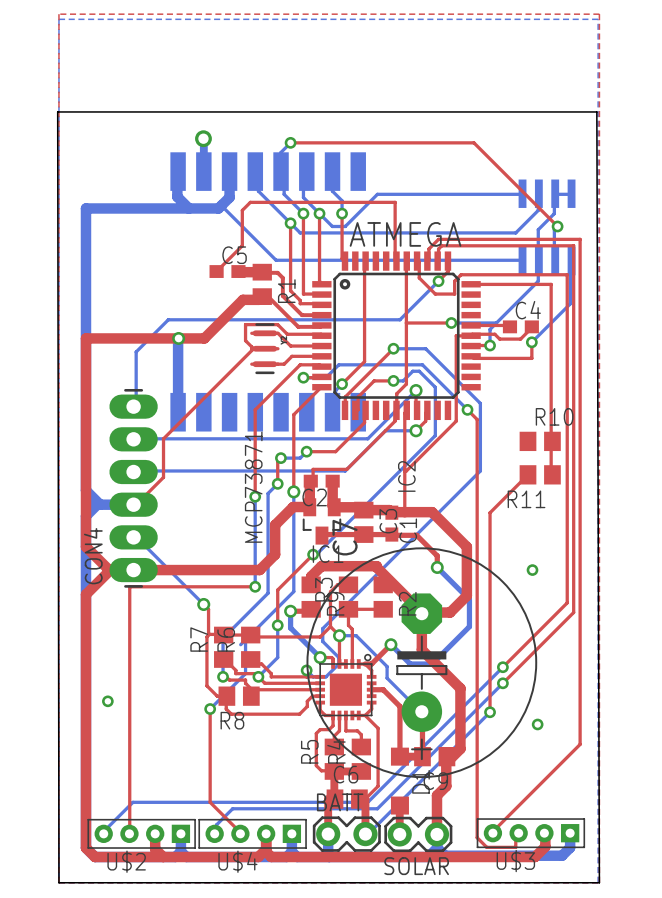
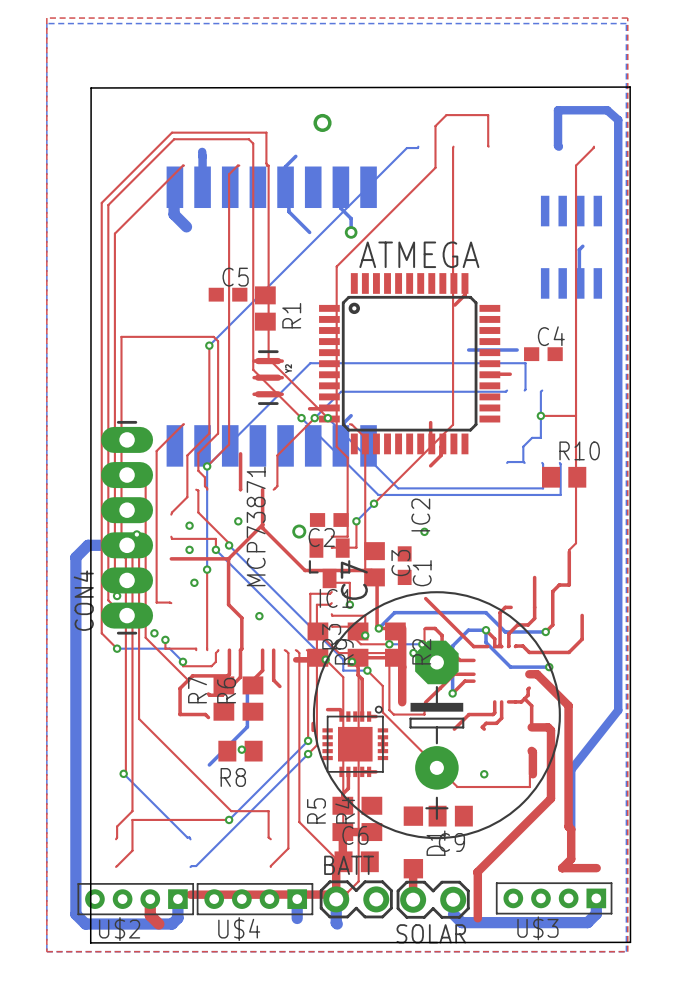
board edge: (57, 111) (596, 111) (599, 882) (58, 882) (57, 111) -> (630, 87) (91, 87) (90, 942) (630, 942) (630, 87)
bottom track: none -> (418, 146) (406, 148) (209, 345)
top track: none -> (453, 146) (453, 424) (374, 503)
top track: none -> (488, 146) (488, 115) (446, 115) (435, 126) (435, 167) (336, 266) (336, 446) (347, 457) (347, 536) (331, 536)
bottom track: none -> (558, 146) (558, 110) (607, 110) (618, 120) (618, 710) (571, 769) (571, 829)
top track: none -> (594, 146) (576, 165) (576, 543) (569, 549) (569, 584) (559, 585) (552, 591) (552, 624) (545, 631)
part position: (203, 138) -> (322, 122)
top track: (290, 142) (473, 142) (557, 226) -> none
via: (290, 142) -> none
top track: none -> (183, 165) (114, 233) (114, 593) (117, 595)
top track: none -> (239, 165) (229, 174) (229, 444) (207, 466)
bottom track: (229, 171) (229, 197) (218, 208) (85, 208) (85, 490) (100, 504) -> none
bottom track: (255, 171) (258, 171) (258, 191) (300, 232) (515, 232) (538, 210) (538, 193) -> none
bottom track: (306, 171) (303, 175) (303, 197) (332, 226) (345, 226) (377, 194) (522, 193) -> none
bottom track: (571, 193) (554, 194) (554, 213) (538, 229) (538, 281) (490, 329) (490, 345) -> none
bottom track: (221, 205) (276, 260) (522, 261) -> none
top track: (303, 213) (303, 294) (321, 294) -> none
via: (303, 213) -> none
top track: (319, 213) (319, 281) (321, 284) -> none
via: (319, 213) -> none
top track: (342, 213) (342, 258) (345, 261) -> none
top track: (290, 223) (290, 290) (300, 300) (300, 303) (321, 304) -> none
via: (290, 223) -> none
via: (557, 226) -> none
top track: (365, 261) (364, 361) (342, 384) -> none
top track: (396, 261) (395, 202) (250, 202) (242, 210) (242, 245) (216, 271) -> none
top track: (406, 261) (406, 384) (396, 393) (395, 421) (346, 469) (313, 469) (313, 477) (309, 482) (309, 507) (293, 507) (275, 525) (275, 554) (259, 570) (110, 570) (85, 594) (85, 848) (94, 857) (258, 857) (266, 849) -> none
top track: (417, 261) (419, 261) (419, 277) (435, 294) (454, 294) (454, 281) (461, 274) (567, 274) (567, 602) (502, 667) -> none
top track: (427, 261) (428, 249) (438, 239) (580, 239) (580, 744) (492, 833) -> none
top track: (437, 261) (438, 249) (441, 245) (573, 245) (573, 612) (502, 683) -> none
bottom track: (571, 261) (570, 303) (531, 342) -> none
top track: (238, 271) (277, 272) (282, 277) (282, 295) (302, 315) (321, 315) -> none
bottom track: (438, 281) (399, 319) (168, 319) (136, 351) (136, 406) (133, 406) -> none
via: (438, 281) -> none
top track: (471, 284) (551, 284) (552, 474) -> none
top track: none -> (209, 345) (209, 433) (187, 455) (187, 497) (171, 514)
via: none -> (209, 345)
top track: (406, 323) (451, 323) -> none
via: (451, 323) -> none
top track: (321, 325) (298, 326) (268, 296) (262, 296) (259, 299) (242, 299) (204, 338) (85, 338) (85, 546) (109, 570) -> none
top track: (471, 325) (509, 326) -> none
top track: (531, 326) (520, 339) (499, 339) (494, 334) (456, 335) (456, 421) (404, 470) -> none
top track: (277, 333) (290, 346) (321, 346) -> none
bottom track: (182, 335) (178, 338) (178, 412) -> none
top track: (321, 335) (287, 334) (277, 324) (245, 324) (245, 340) (251, 347) (251, 350) (163, 438) (163, 477) (137, 503) (133, 504) -> none
via: (178, 338) -> none
top track: (531, 342) (531, 358) (473, 358) (471, 356) -> none
via: (531, 342) -> none
via: (490, 345) -> none
top track: (393, 348) (345, 396) (345, 410) -> none
bottom track: (393, 348) (425, 348) (480, 403) (480, 470) (322, 628) (322, 641) (338, 657) (338, 664) (325, 676) (313, 676) (306, 670) -> none
via: (393, 348) -> none
top track: (321, 356) (292, 356) (284, 364) (277, 364) -> none
bottom track: none -> (507, 390) (341, 391) (314, 418)
bottom track: none -> (524, 390) (525, 363) (310, 363) (207, 466) (207, 569)
bottom track: none -> (542, 390) (540, 437) (532, 437) (523, 446) (523, 462)
top track: (321, 366) (319, 364) (300, 364) (255, 409) (255, 496) -> none
bottom track: (303, 377) (325, 377) (338, 364) (422, 364) (467, 409) -> none
via: (303, 377) -> none
top track: (393, 380) (374, 380) (358, 396) (358, 409) (355, 410) -> none
bottom track: (393, 380) (403, 380) (412, 371) (419, 371) (435, 387) (435, 435) (316, 554) (313, 554) -> none
via: (393, 380) -> none
via: (342, 384) -> none
top track: none -> (540, 415) (576, 415)
via: none -> (540, 415)
top track: none -> (301, 418) (253, 369) (253, 143) (248, 139) (174, 139) (108, 205) (108, 600) (117, 609)
bottom track: none -> (301, 418) (378, 494) (560, 494) (559, 462)
via: none -> (301, 418)
top track: none -> (314, 418) (277, 455) (277, 486) (273, 489)
via: none -> (314, 418)
top track: none -> (327, 418) (268, 358) (268, 165) (266, 163) (266, 132) (172, 132) (101, 202) (101, 633) (117, 648)
bottom track: none -> (327, 418) (398, 488) (543, 488) (542, 462)
via: none -> (327, 418)
top track: (321, 387) (293, 414) (293, 491) -> none
bottom track: (416, 390) (367, 438) (133, 439) -> none
via: (416, 390) -> none
top track: none -> (183, 424) (156, 451) (156, 602) (171, 603)
top track: none -> (349, 424) (365, 437) (365, 570)
top track: (467, 409) (477, 419) (477, 837) (486, 847) (515, 847) (515, 834) (518, 833) -> none
via: (467, 409) -> none
top track: (365, 410) (364, 422) (335, 451) (306, 451) -> none
top track: (406, 410) (404, 413) (404, 512) -> none
top track: none -> (240, 453) (240, 489)
bottom track: none -> (523, 462) (507, 462)
bottom track: none -> (523, 462) (524, 462)
bottom track: (416, 430) (385, 430) (345, 470) (133, 472) -> none
via: (416, 430) -> none
via: none -> (207, 466)
top track: none -> (134, 468) (145, 479) (145, 637) (188, 680)
bottom track: (306, 451) (300, 458) (280, 458) -> none
via: (306, 451) -> none
top track: none -> (196, 489) (198, 490) (198, 512) (229, 545)
top track: none -> (207, 489) (204, 486) (204, 477) (198, 470) (198, 453) (218, 433) (218, 341) (213, 336) (121, 336) (121, 554) (125, 558) (125, 771) (123, 773)
top track: none -> (262, 489) (262, 528) (305, 570) (371, 570) (377, 575) (377, 626) (378, 628) (402, 628) (402, 702)
top track: (280, 458) (277, 461) (277, 483) -> none
via: (280, 458) -> none
bottom track: none -> (374, 503) (356, 521)
via: none -> (374, 503)
top track: (527, 474) (490, 512) (490, 712) -> none
R11: (540, 474) -> none
top track: (332, 481) (334, 507) (360, 507) (363, 510) (389, 510) (391, 512) (432, 512) (466, 546) (466, 595) (450, 612) (421, 612) -> none
via: none -> (238, 521)
top track: none -> (356, 521) (356, 547) (331, 547)
via: none -> (356, 521)
bottom track: (277, 483) (268, 493) (268, 593) (223, 638) (223, 676) -> none
via: (277, 483) -> none
top track: none -> (262, 524) (228, 558)
via: none -> (189, 525)
bottom track: (293, 491) (293, 591) (240, 644) -> none
via: none -> (424, 531)
top track: none -> (136, 534) (128, 543) (128, 552) (132, 556) (132, 811) (117, 826) (116, 839)
via: none -> (136, 534)
top track: none -> (171, 536) (172, 538) (215, 538) (215, 549)
bottom track: (255, 496) (255, 586) -> none
via: (255, 496) -> none
bottom track: none -> (229, 545) (343, 659) (343, 670) (367, 670)
via: none -> (229, 545)
top track: none -> (136, 547) (139, 549) (139, 718) (231, 811) (268, 811) (268, 837) (270, 839)
via: none -> (189, 549)
bottom track: none -> (215, 549) (325, 659)
via: none -> (215, 549)
top track: none -> (171, 558) (228, 558)
top track: none -> (228, 558) (228, 604) (241, 617) (240, 677) (222, 695) (208, 694)
top track: none -> (207, 569) (207, 650)
via: none -> (207, 569)
top track: none -> (534, 577) (534, 618) (528, 624) (517, 624) (508, 633) (508, 646)
top track: (321, 535) (416, 535) (437, 555) (437, 567) -> none
bottom track: (133, 537) (137, 538) (203, 604) -> none
top track: none -> (331, 581) (332, 582) (349, 582) (349, 604)
via: none -> (194, 582)
top track: none -> (331, 592) (330, 593) (310, 593) (310, 633) (316, 639) (316, 745) (308, 754)
via: none -> (117, 595)
top track: (313, 554) (277, 590) (277, 625) -> none
via: (313, 554) -> none
top track: none -> (425, 598) (473, 646) (487, 646)
top track: none -> (331, 603) (316, 604) (316, 631) (338, 653) (389, 653) (389, 710) (393, 714) (424, 714) (424, 703) (454, 674) (473, 674)
via: none -> (349, 604)
top track: none -> (511, 607) (505, 607) (500, 612) (500, 645) (501, 646) (494, 646) (494, 638) (486, 630)
bottom track: (437, 567) (469, 599) (469, 626) (432, 664) (410, 664) (390, 644) -> none
via: (437, 567) -> none
top track: none -> (331, 614) (332, 615) (365, 615) (365, 635)
top track: none -> (582, 615) (582, 639) (568, 652) (529, 652) (522, 646) (515, 646)
via: none -> (259, 616)
via: (532, 570) -> none
top track: none -> (331, 625) (356, 626) (356, 639) (360, 644) (389, 644)
bottom track: none -> (378, 628) (394, 612) (486, 612) (505, 631) (545, 631)
via: none -> (378, 628)
via: none -> (486, 630)
top track: (348, 584) (337, 584) (330, 591) (330, 626) -> none
via: none -> (545, 631)
via: none -> (154, 633)
top track: (255, 586) (129, 586) (129, 833) -> none
via: (255, 586) -> none
via: none -> (365, 635)
top track: none -> (165, 639) (165, 648) (196, 650)
via: none -> (165, 639)
bottom track: none -> (389, 644) (422, 644)
via: none -> (389, 644)
top track: none -> (422, 644) (424, 642) (424, 628) (435, 628) (442, 635) (442, 642) (459, 660) (473, 660)
via: none -> (422, 644)
bottom track: none -> (117, 648) (169, 648) (182, 661)
via: none -> (117, 648)
top track: none -> (218, 650) (215, 653) (215, 661) (211, 666) (182, 666) (182, 661)
top track: none -> (229, 650) (229, 674) (227, 675) (192, 675) (180, 688) (180, 714) (205, 714) (208, 717)
top track: none -> (262, 650) (262, 670) (246, 686)
top track: none -> (273, 650) (273, 680) (279, 686)
top track: none -> (284, 650) (288, 653) (288, 848) (270, 866)
top track: none -> (295, 650) (299, 653) (299, 822) (344, 866)
top track: none -> (306, 650) (308, 740)
top track: (203, 604) (208, 609) (209, 634) -> none
via: (203, 604) -> none
via: none -> (413, 653)
bottom track: (290, 611) (290, 627) (320, 657) -> none
via: (290, 611) -> none
top track: none -> (325, 659) (343, 677) (344, 839)
via: none -> (325, 659)
top track: (421, 612) (421, 649) (460, 688) (460, 748) (446, 763) -> none
top track: (421, 612) (376, 566) (321, 566) (311, 576) (311, 584) (311, 575) (320, 566) (374, 566) (383, 575) (383, 584) (393, 584) (421, 613) -> none
via: none -> (182, 661)
top track: none -> (352, 661) (358, 668) (358, 881) (344, 894) (270, 894)
via: none -> (352, 661)
bottom track: none -> (549, 667) (510, 667) (486, 642) (486, 630) (468, 630) (452, 646) (452, 693)
via: none -> (549, 667)
top track: none -> (367, 670) (382, 686) (382, 712) (457, 787) (529, 787) (529, 776) (532, 774) (531, 750)
via: none -> (367, 670)
top track: none -> (529, 674) (537, 674) (568, 705) (568, 826) (571, 829) (571, 859) (562, 868) (596, 868)
bottom track: (277, 625) (277, 657) (258, 676) -> none
via: (277, 625) -> none
top track: (330, 626) (320, 636) (252, 636) (250, 635) (209, 634) -> none
top track: (330, 626) (339, 635) (339, 664) (345, 664) -> none
top track: none -> (473, 681) (464, 681) (452, 693)
top track: (209, 634) (206, 636) (206, 685) (217, 696) (226, 696) (226, 709) (231, 714) (299, 714) (307, 706) (307, 701) (312, 696) (320, 696) -> none
bottom track: (339, 635) (356, 635) (387, 666) (387, 678) (408, 700) (416, 700) (421, 705) (421, 711) (423, 710) -> none
via: (339, 635) -> none
top track: none -> (529, 688) (528, 695) (521, 701) (508, 701)
via: none -> (452, 693)
top track: (390, 644) (371, 664) (365, 664) (371, 670) (371, 676) -> none
via: (390, 644) -> none
top track: none -> (524, 698) (531, 705) (531, 727) (548, 727) (550, 730) (550, 798) (477, 872) (477, 918)
top track: none -> (494, 701) (493, 714) (468, 714) (454, 729)
top track: none -> (501, 701) (501, 718) (496, 723) (486, 723) (482, 727) (484, 729)
via: (320, 657) -> none
top track: (223, 659) (235, 670) (235, 673) (255, 673) (264, 683) (320, 683) -> none
top track: (255, 664) (261, 664) (271, 673) (271, 676) (320, 676) -> none
bottom track: (502, 667) (367, 802) (132, 802) (104, 831) (103, 833) -> none
via: (502, 667) -> none
via: (306, 670) -> none
top track: (223, 676) (229, 680) (245, 680) (245, 683) (251, 689) -> none
via: (223, 676) -> none
via: (258, 676) -> none
bottom track: (502, 683) (377, 808) (232, 808) (216, 824) (214, 833) -> none
via: (502, 683) -> none
bottom track: none -> (308, 740) (229, 819)
via: none -> (308, 740)
top track: (251, 689) (320, 689) -> none
top track: (371, 689) (383, 689) (399, 706) (399, 756) (422, 756) (421, 711) -> none
via: none -> (241, 749)
bottom track: none -> (308, 754) (196, 866) (190, 867)
via: none -> (308, 754)
via: (107, 701) -> none
top track: (320, 702) (320, 710) (325, 715) (333, 715) (333, 725) (329, 729) (320, 729) (316, 733) (316, 765) (321, 770) (334, 771) -> none
top track: (371, 702) (371, 709) (365, 715) (378, 728) (378, 786) (365, 799) (359, 799) (365, 799) (365, 834) -> none
top track: (210, 709) (210, 802) (240, 833) -> none
via: (210, 709) -> none
bottom track: (490, 712) (367, 834) (365, 834) -> none
via: (490, 712) -> none
top track: (345, 715) (345, 730) (357, 730) (361, 734) (361, 746) -> none
bottom track: none -> (123, 773) (190, 839)
via: none -> (123, 773)
via: none -> (484, 774)
via: (537, 724) -> none
top track: (446, 756) (446, 786) (436, 795) (436, 834) -> none
top track: none -> (229, 819) (132, 819) (132, 850) (116, 866)
via: none -> (229, 819)
top track: none -> (190, 894) (270, 894)
top track: (544, 833) (545, 846) (535, 857) (271, 857) (266, 851) (266, 833) -> none

